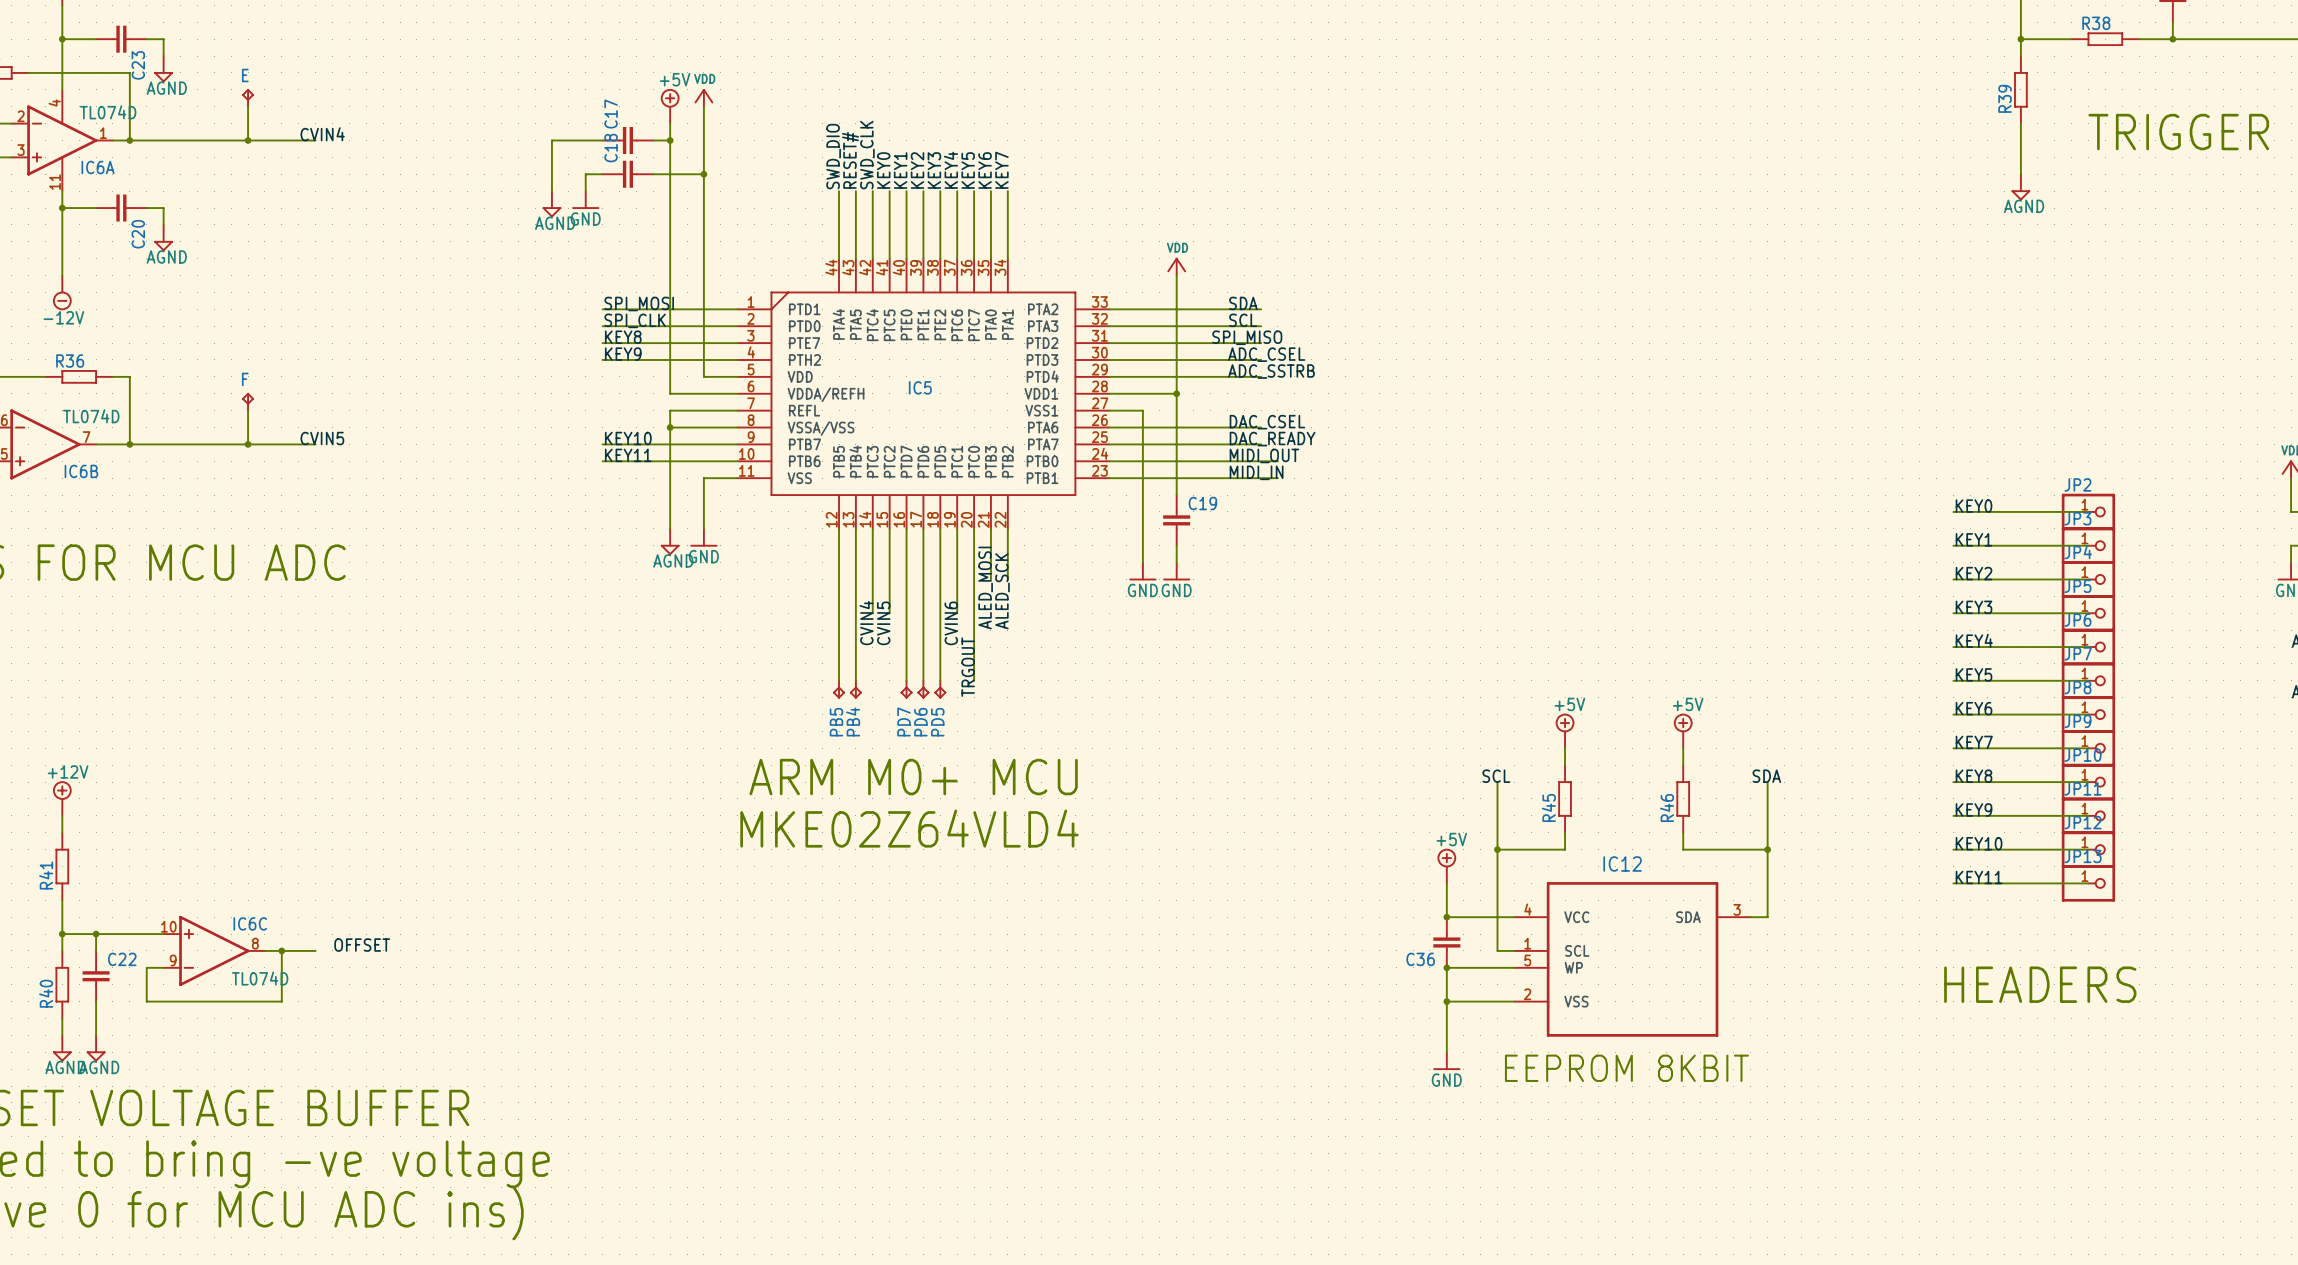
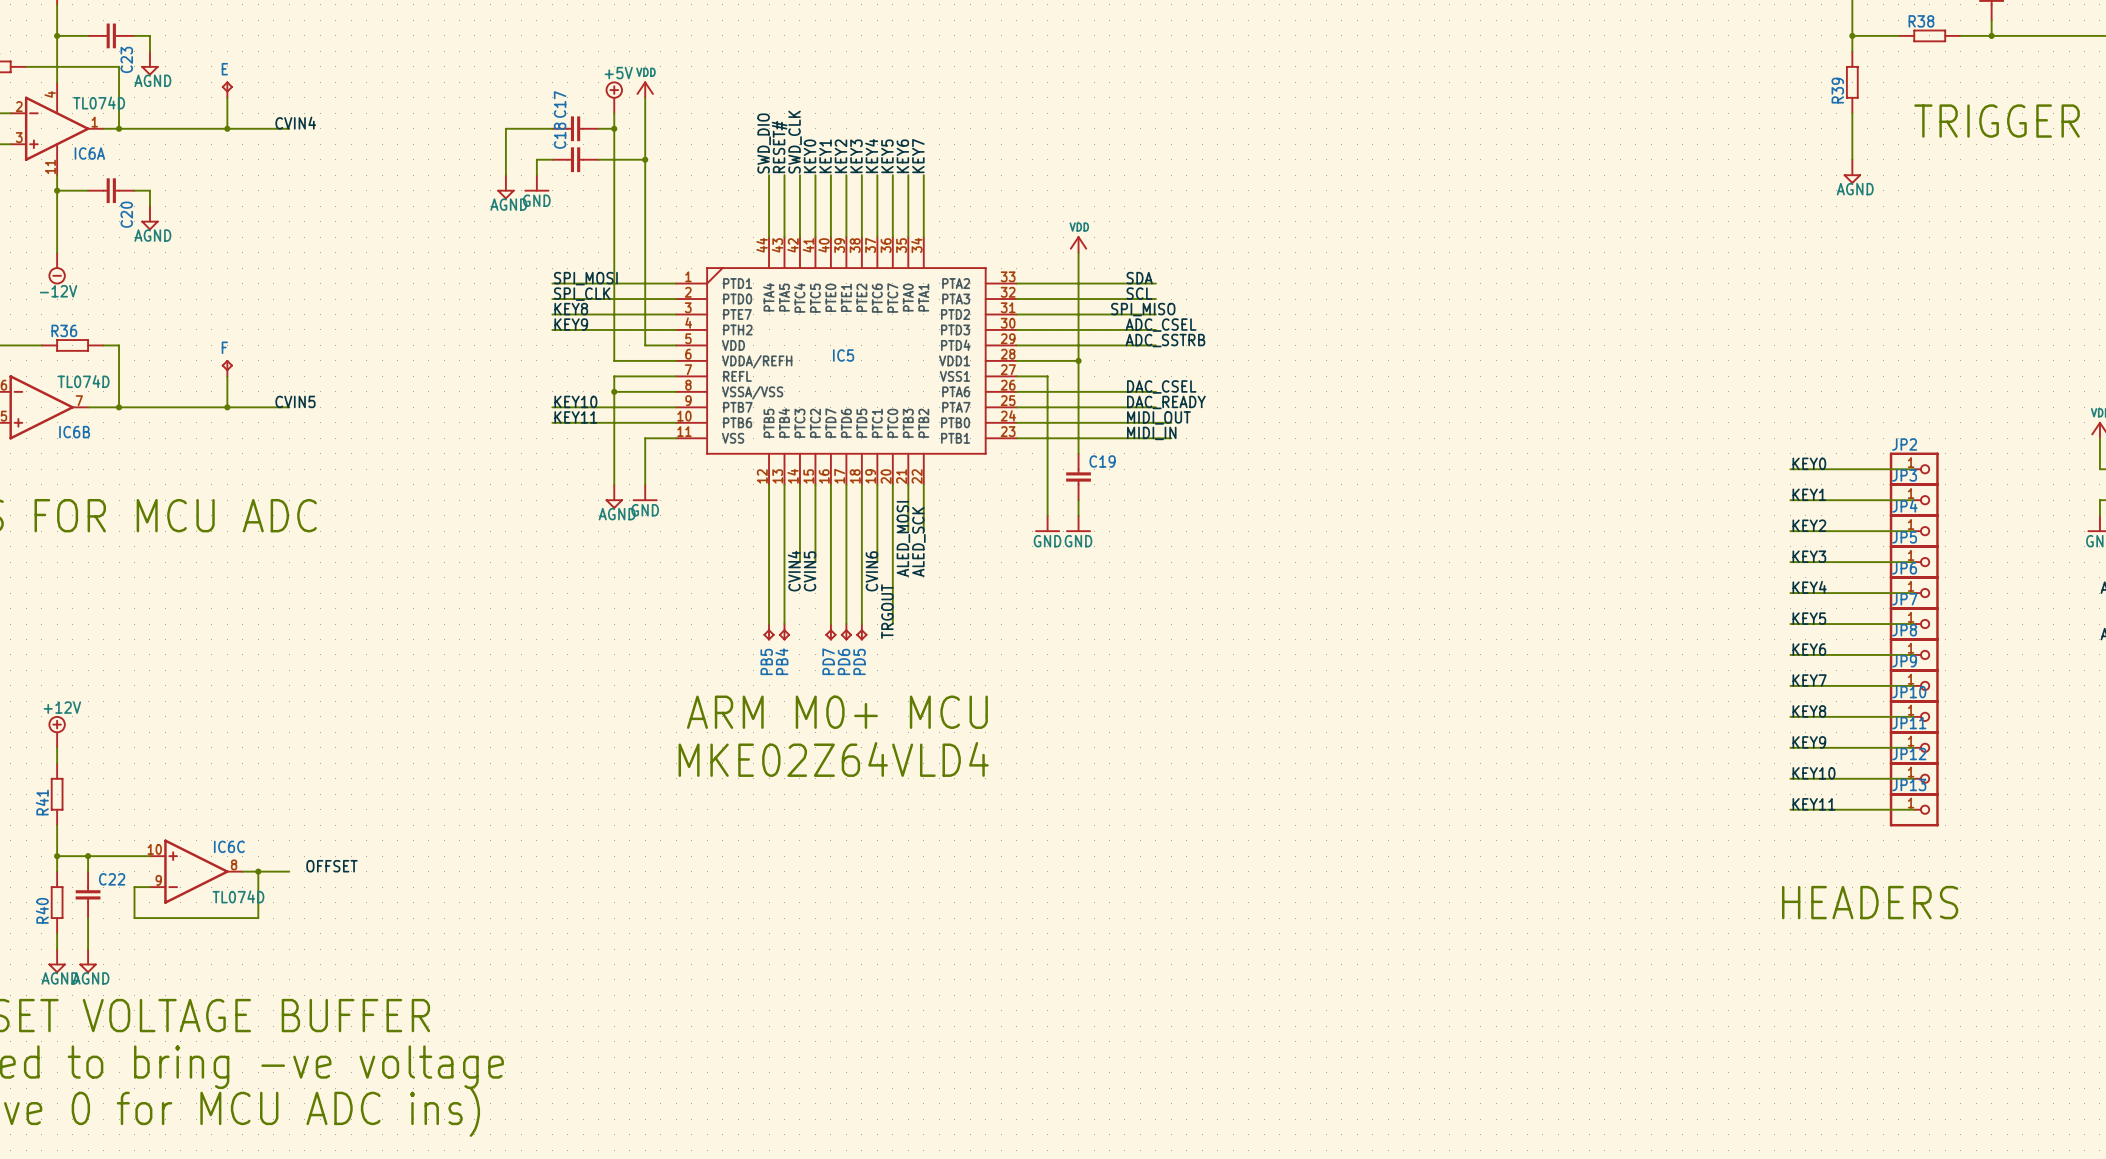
power symbol: +5V (1565, 731) -> none
power symbol: +5V (1683, 731) -> none
wire: (1565, 748) (1565, 765) -> none
wire: (1683, 748) (1683, 765) -> none
label: SCL (1496, 776) -> none
label: SDA (1766, 776) -> none
wire: (1497, 782) (1497, 950) (1514, 950) -> none
wire: (1767, 782) (1767, 917) (1750, 917) -> none
R45: (1565, 798) -> none
R46: (1683, 798) -> none
wire: (1565, 832) (1565, 849) (1497, 849) -> none
wire: (1683, 832) (1683, 849) (1767, 849) -> none
junction: (1497, 849) -> none
junction: (1767, 849) -> none
power symbol: +5V (1446, 866) -> none
wire: (1446, 883) (1446, 917) (1514, 917) -> none
junction: (1446, 917) -> none
C36: (1446, 942) -> none
IC12: (1632, 959) -> none
junction: (1446, 967) -> none
wire: (1514, 967) (1446, 967) (1446, 1052) -> none
wire: (1446, 1001) (1514, 1001) -> none
junction: (1446, 1001) -> none
power symbol: GND (1446, 1061) -> none
text: EEPROM 8KBIT (1626, 1068) -> none

